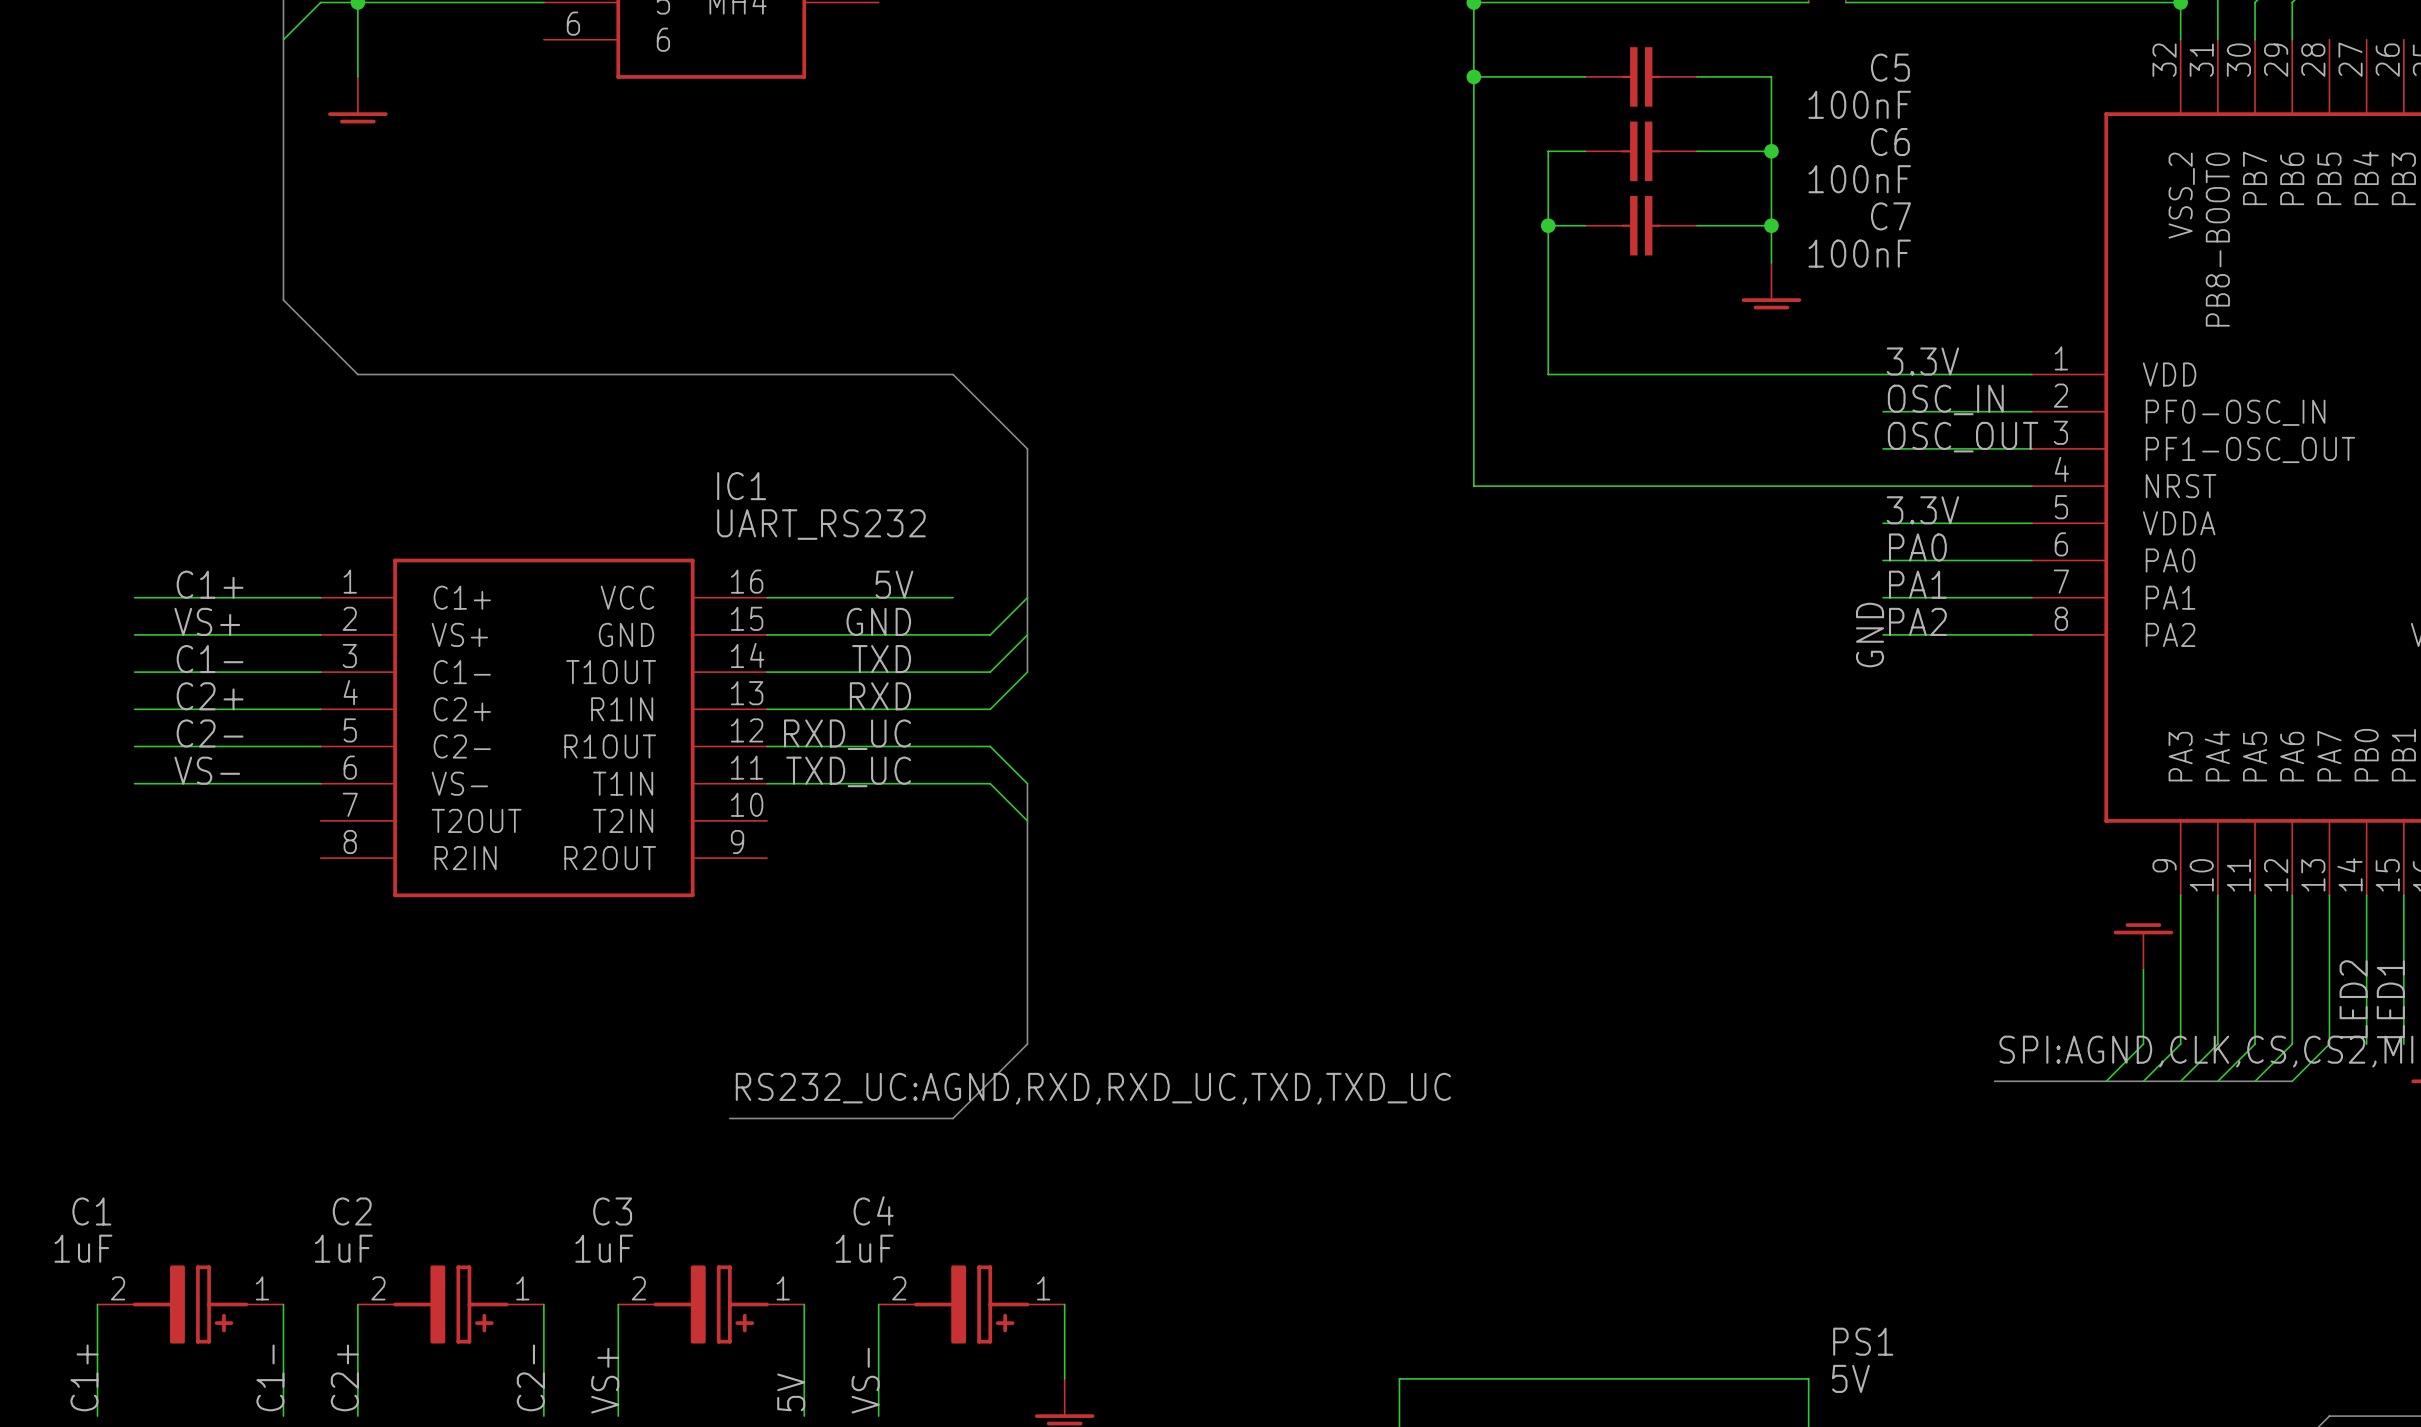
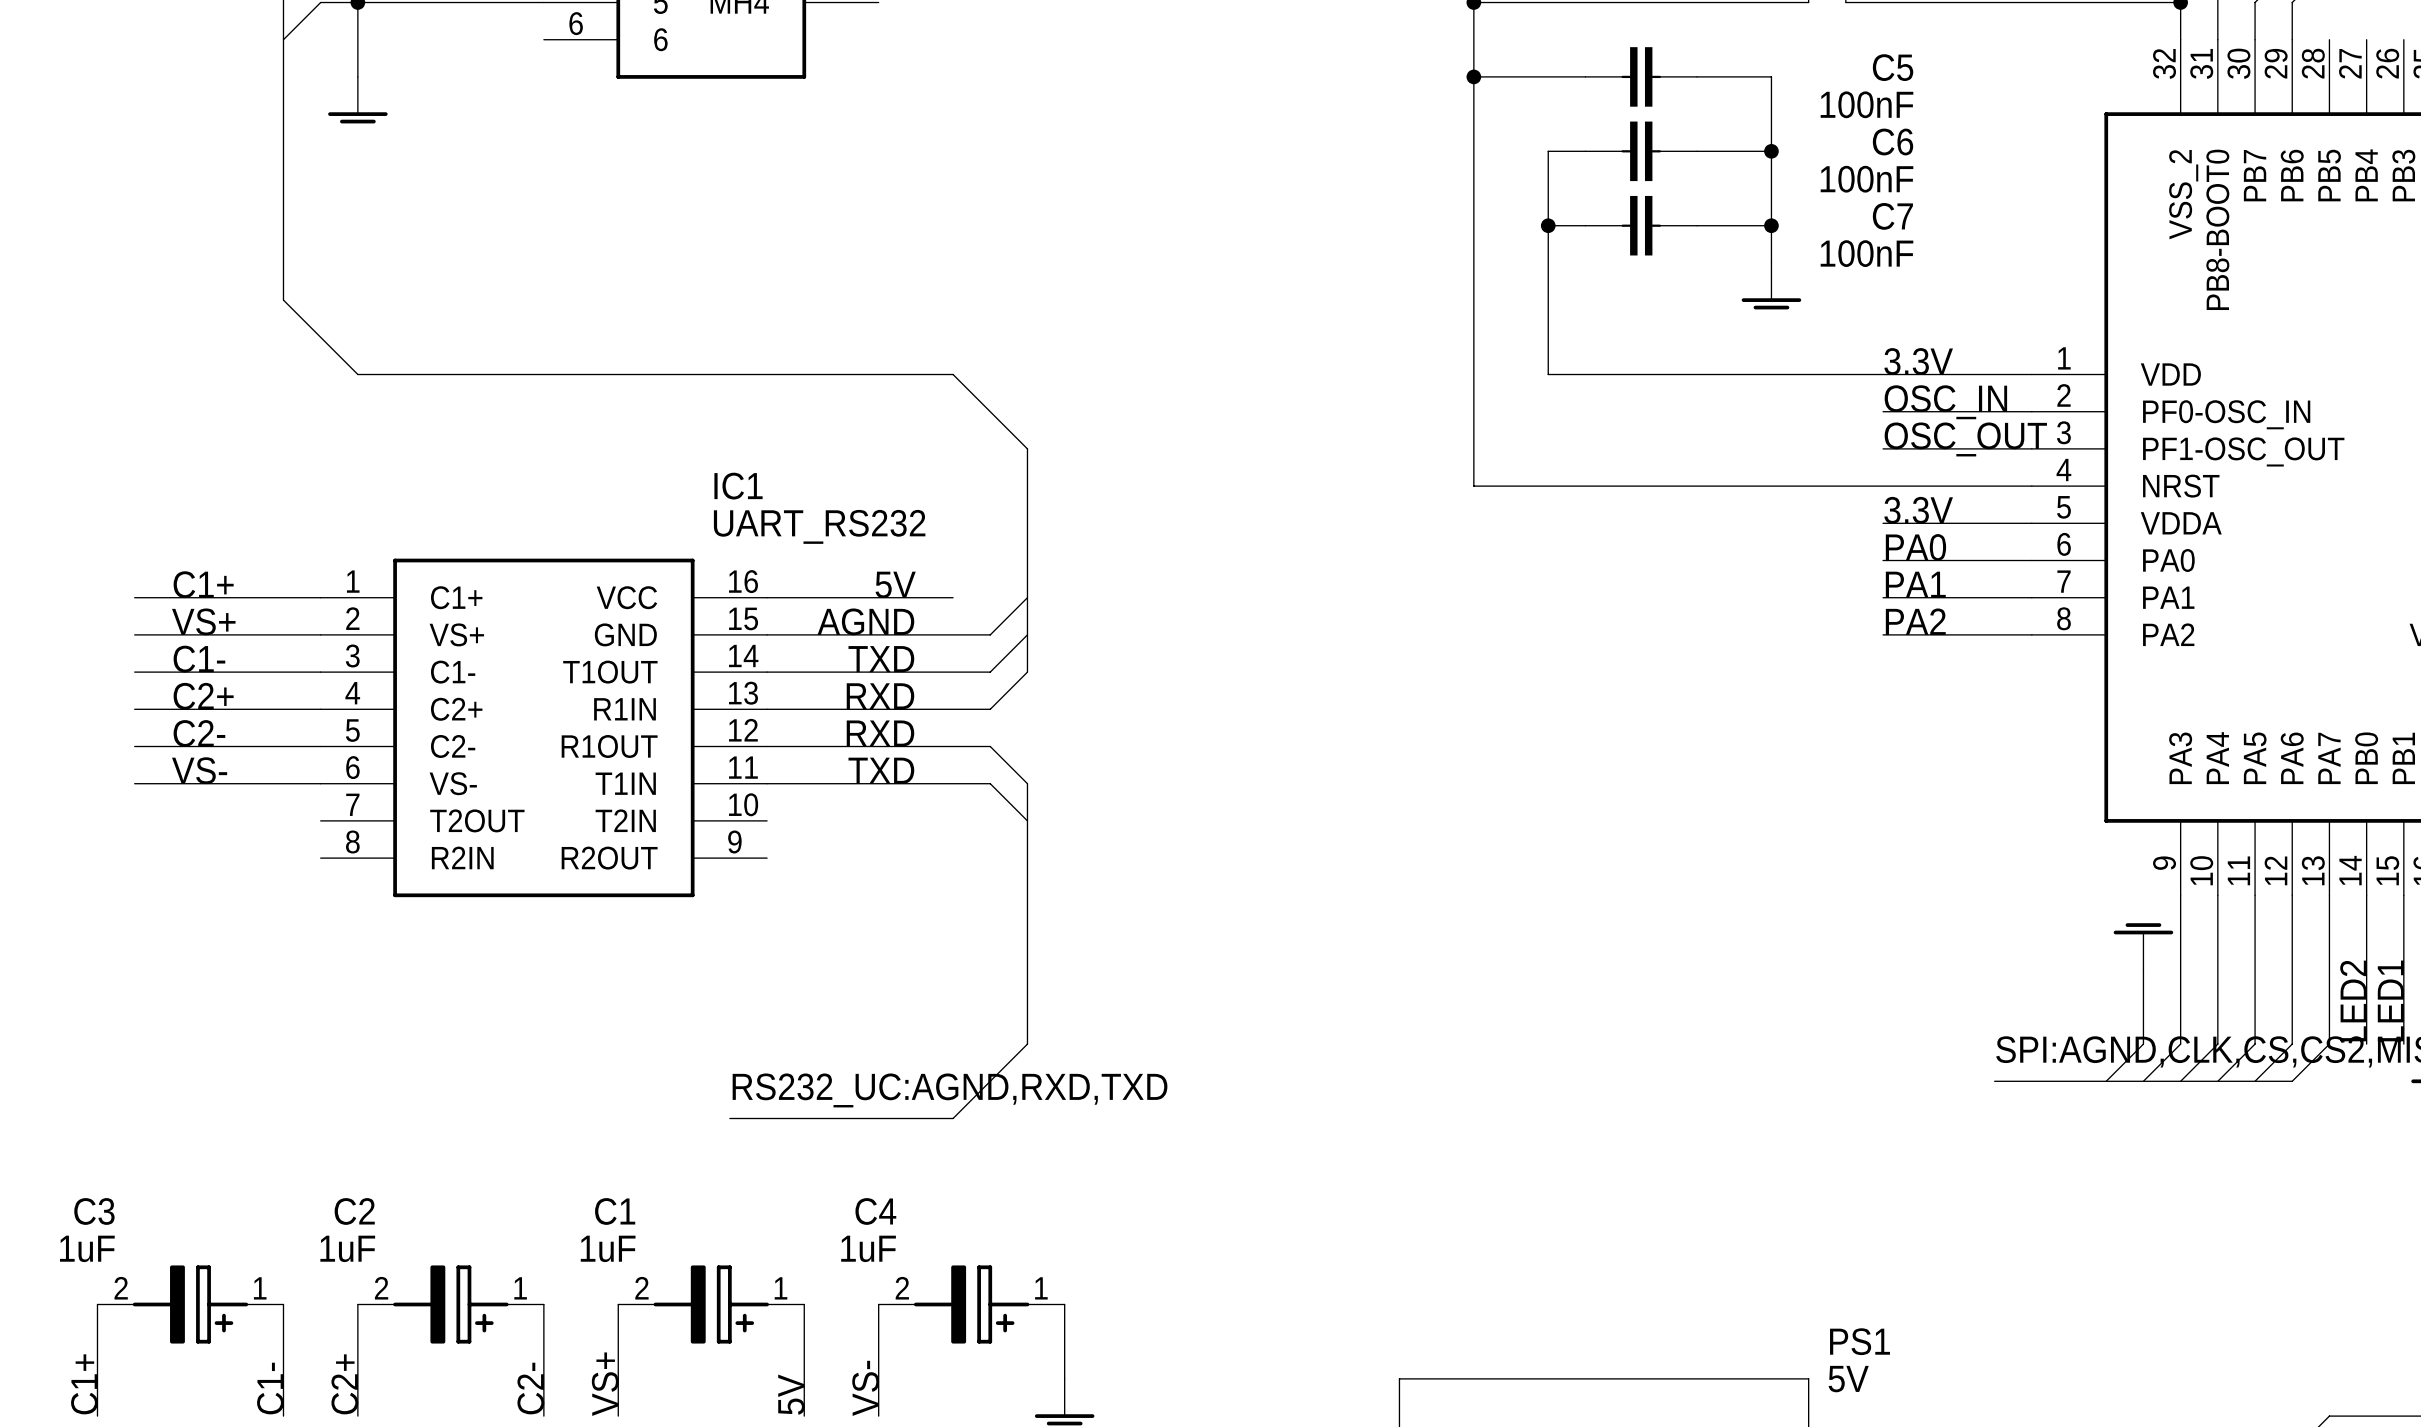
label: GND (878, 621) -> AGND (865, 621)
label: GND (1870, 635) -> none
label: RXD_UC (847, 734) -> RXD (880, 733)
label: TXD_UC (848, 771) -> TXD (881, 770)
label: RS232_UC:AGND,RXD,RXD_UC,TXD,TXD_UC (1093, 1088) -> RS232_UC:AGND,RXD,TXD (950, 1090)
C1 name: C1 (91, 1211) -> C3 (94, 1211)
C3 name: C3 (612, 1211) -> C1 (615, 1211)

